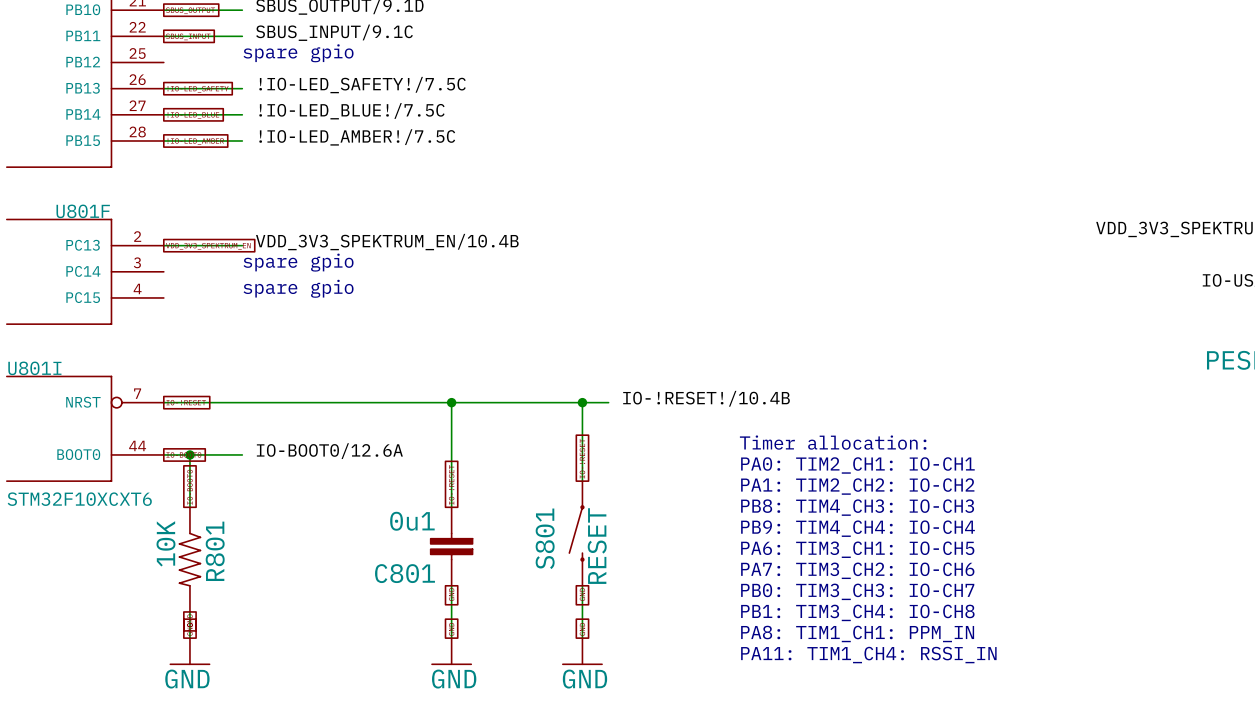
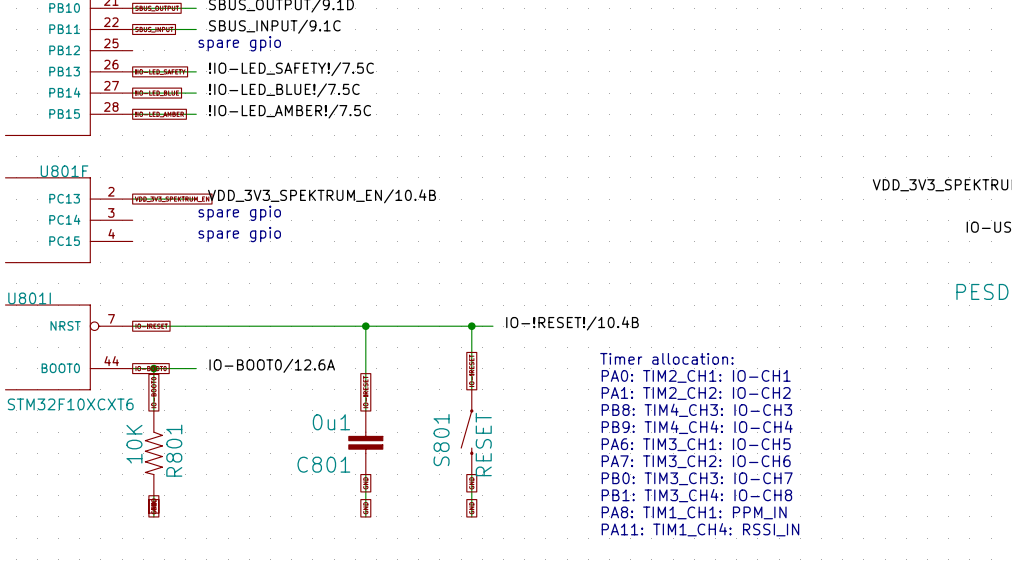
power symbol: GND (189, 651) -> none
power symbol: GND (451, 651) -> none
power symbol: GND (582, 651) -> none

